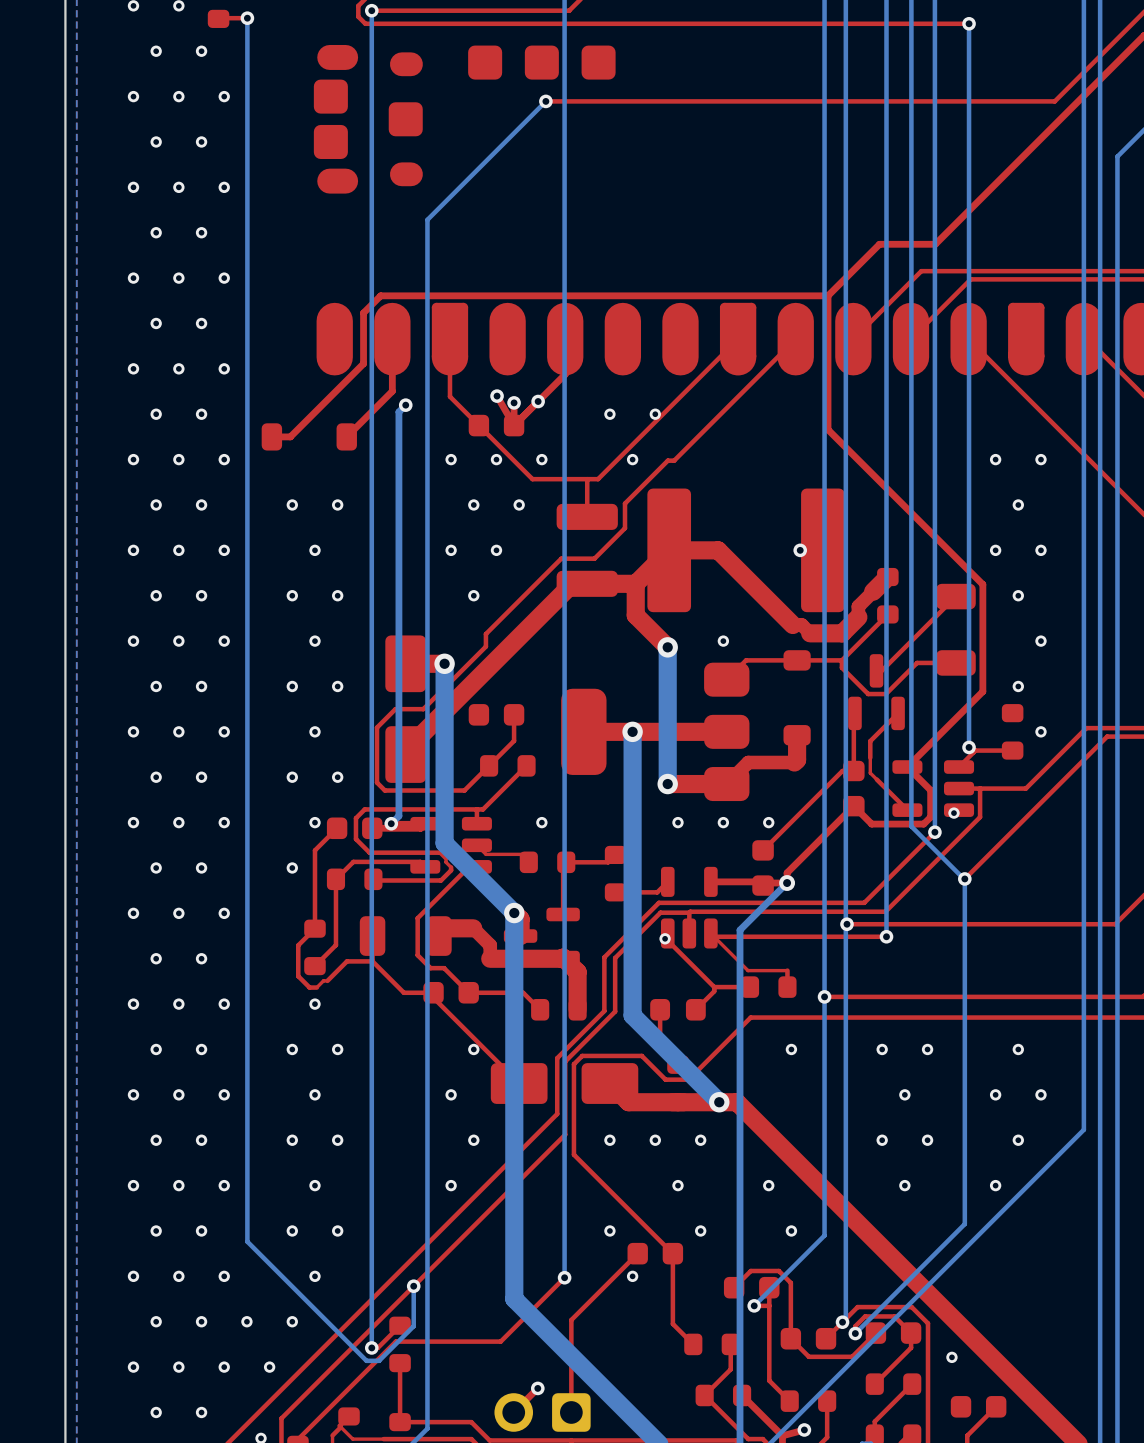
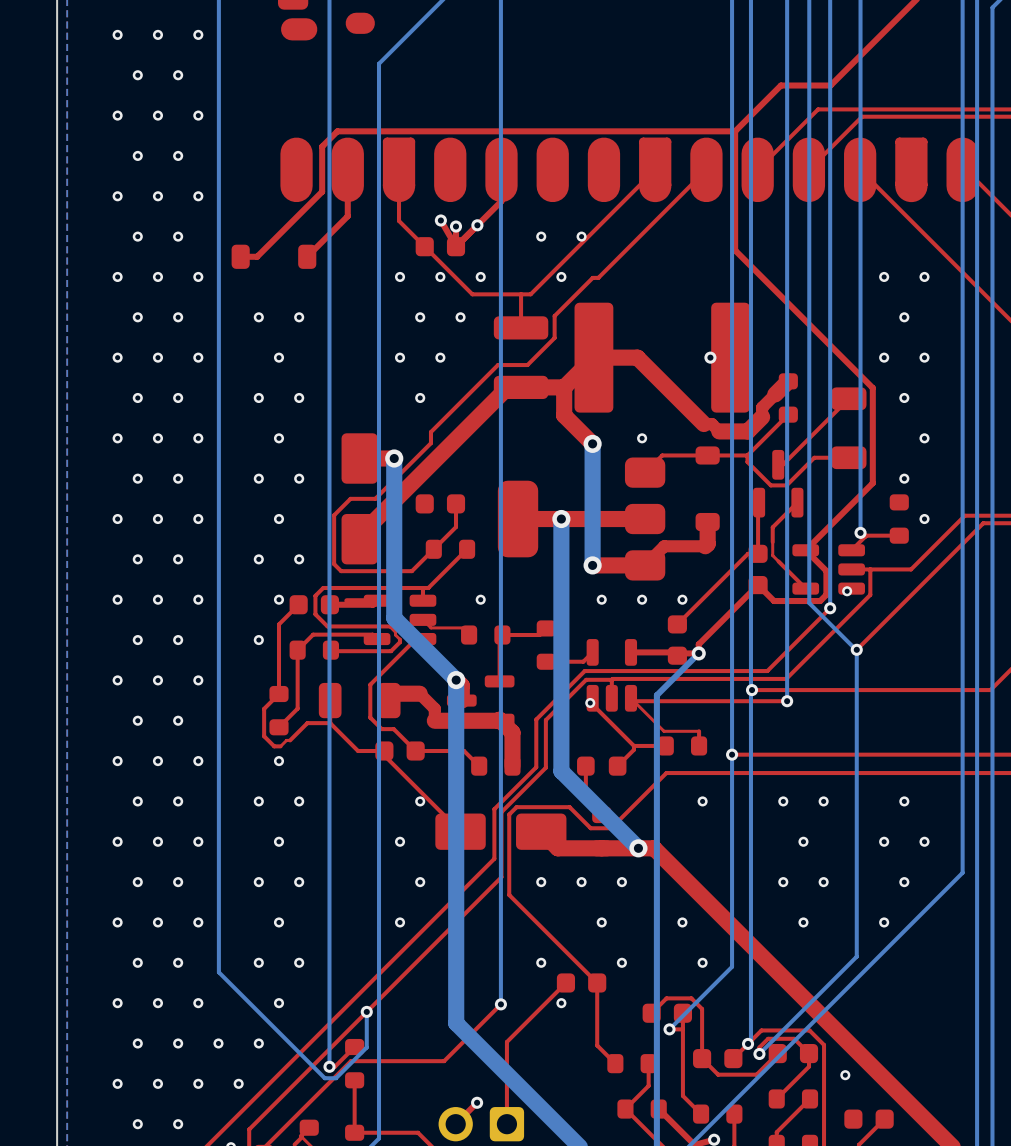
bottom track: (405, 405) (398, 411) (398, 816) (391, 823) -> none
via: (405, 405) -> none
via: (391, 823) -> none

